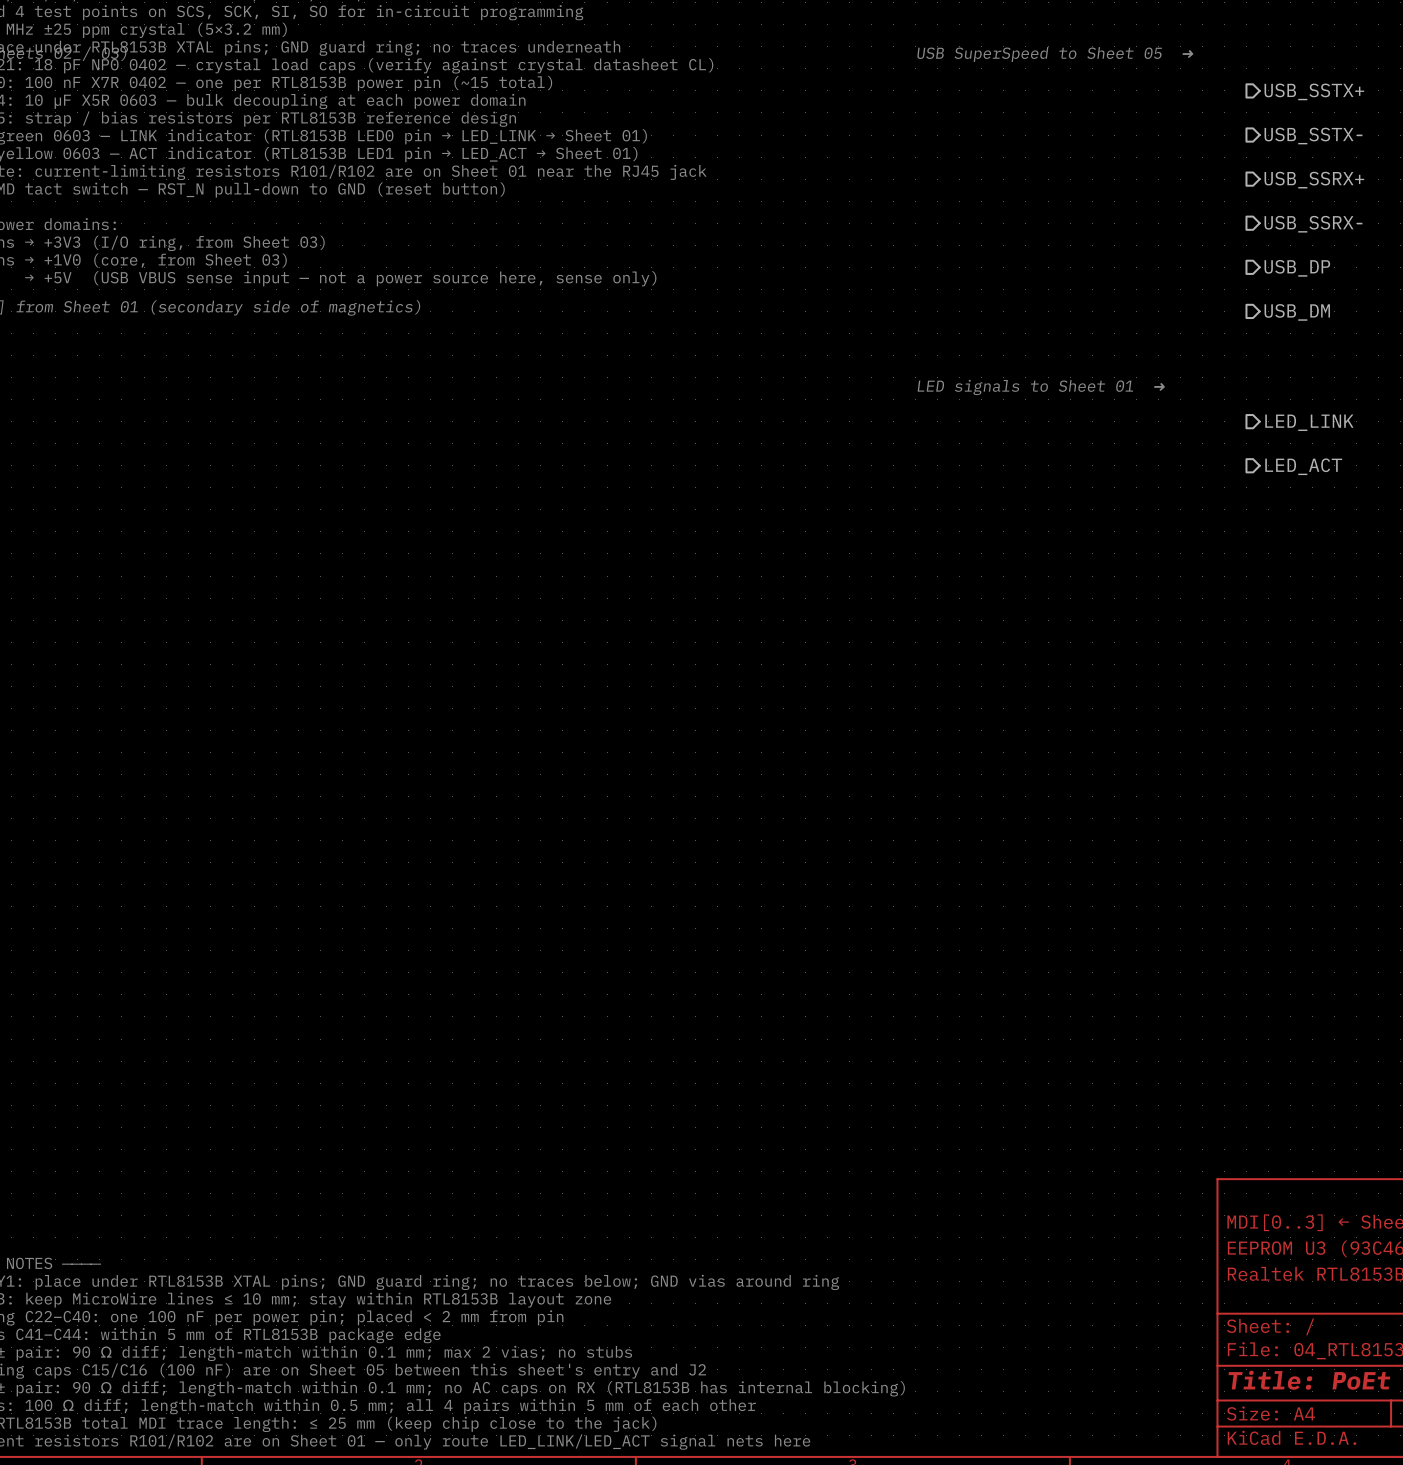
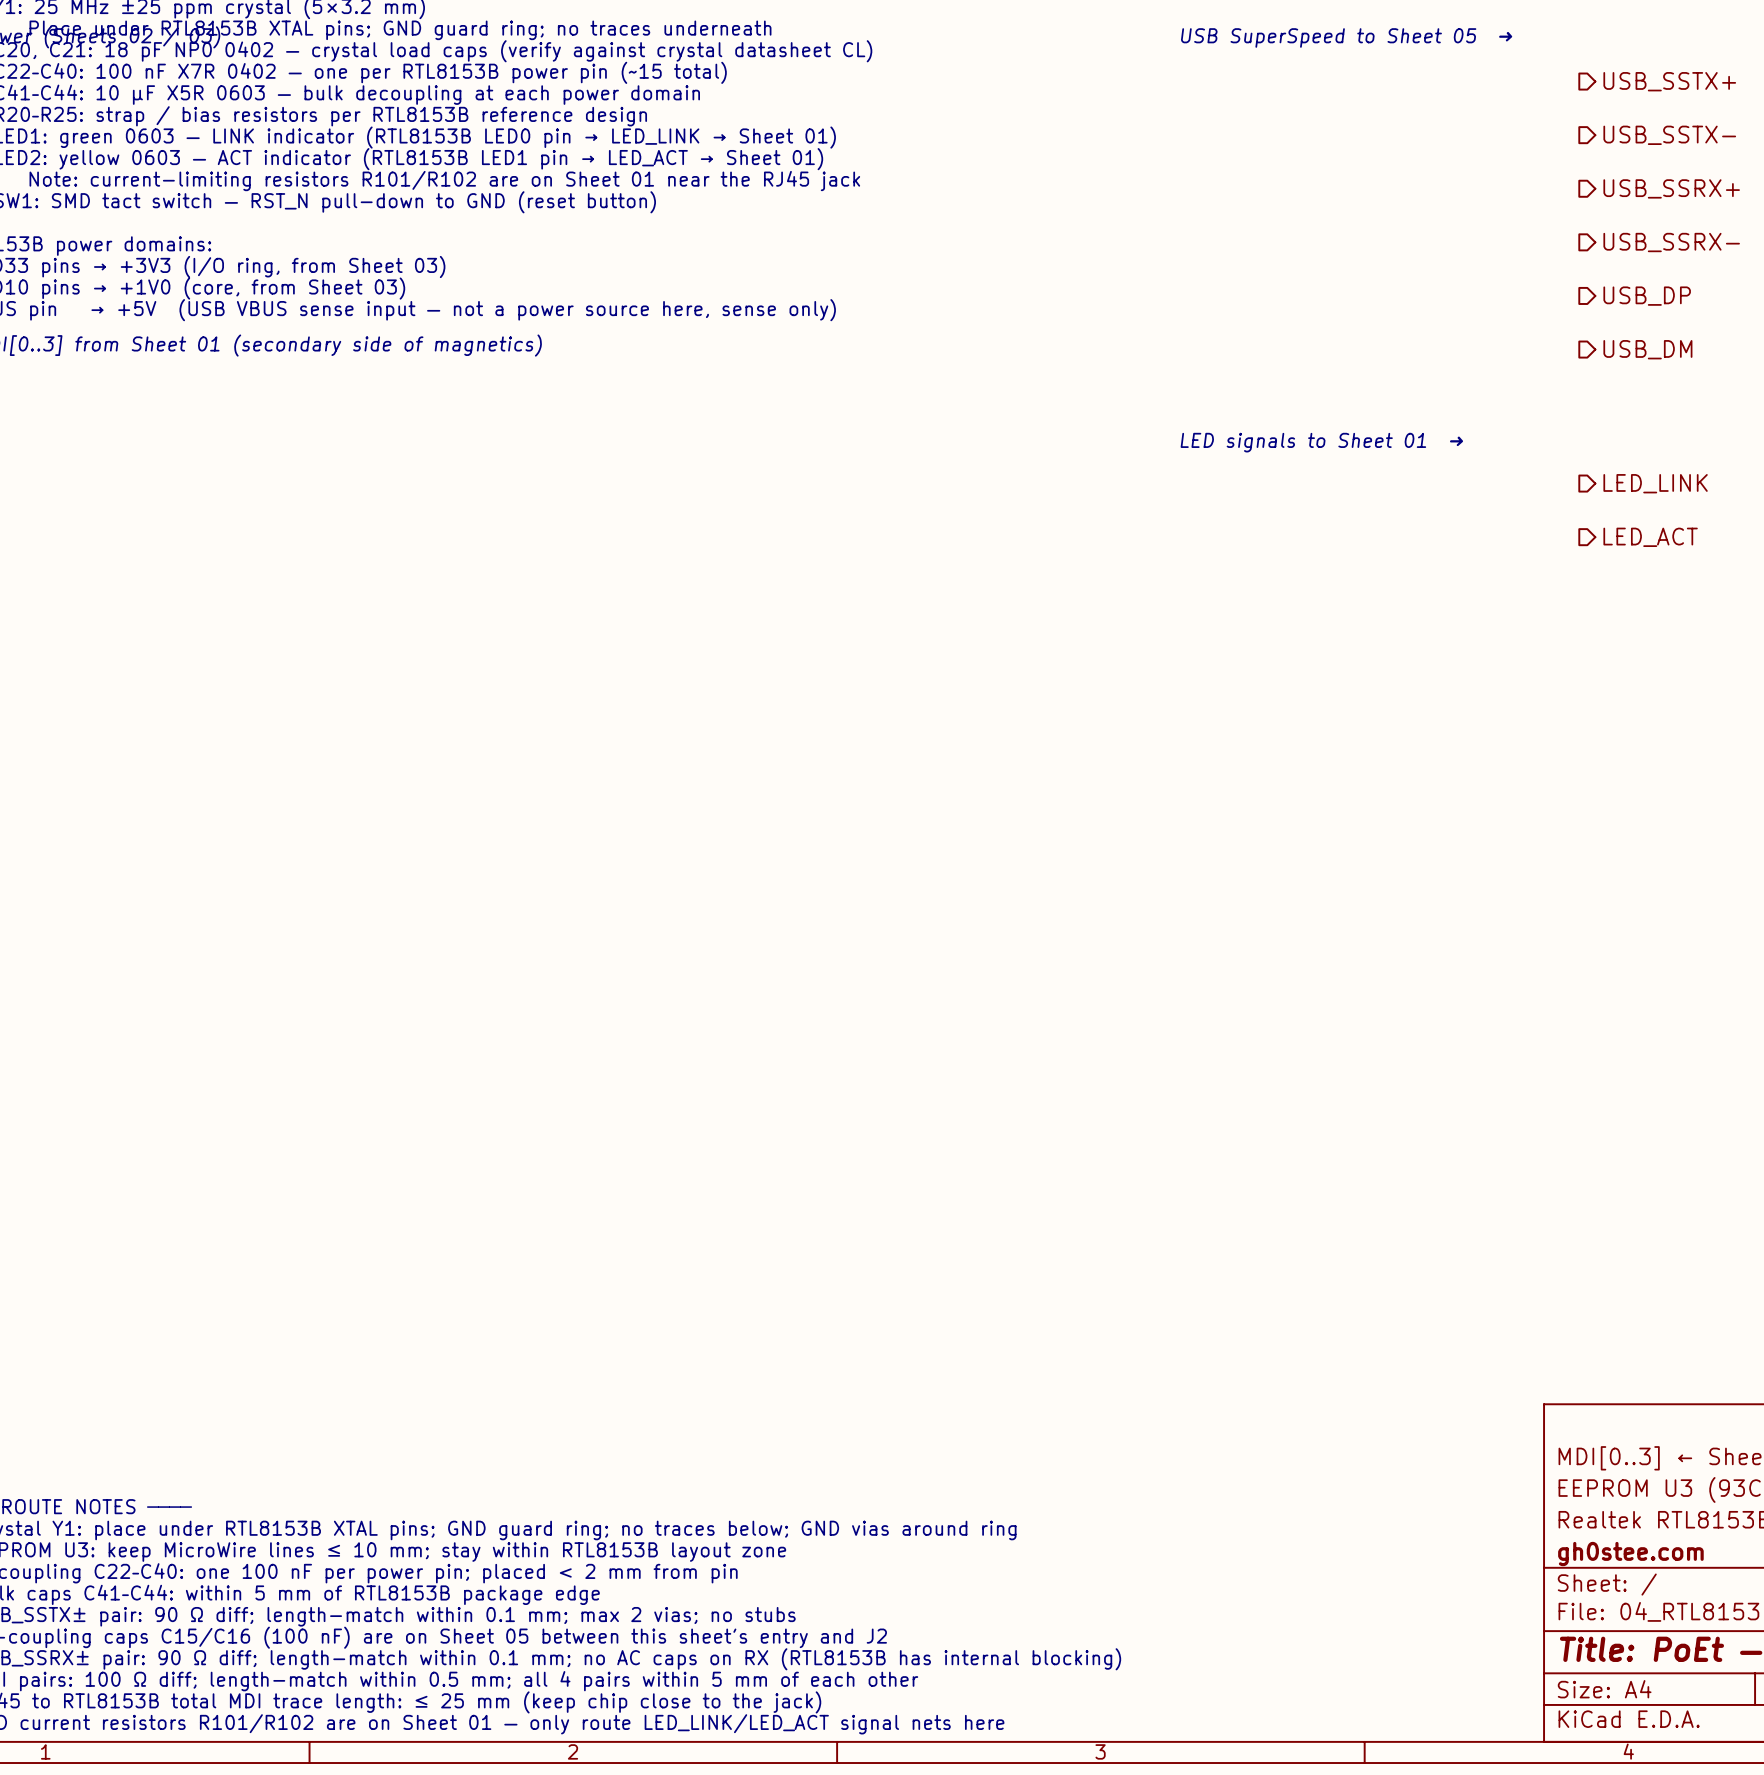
title block: none -> gh0stee.com (1630, 1554)

